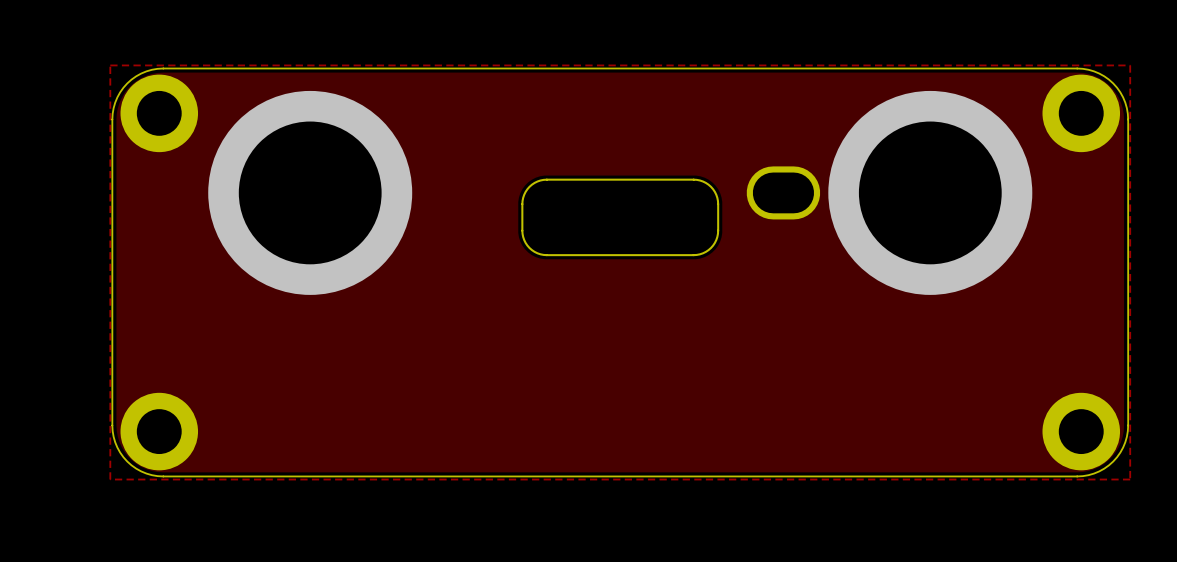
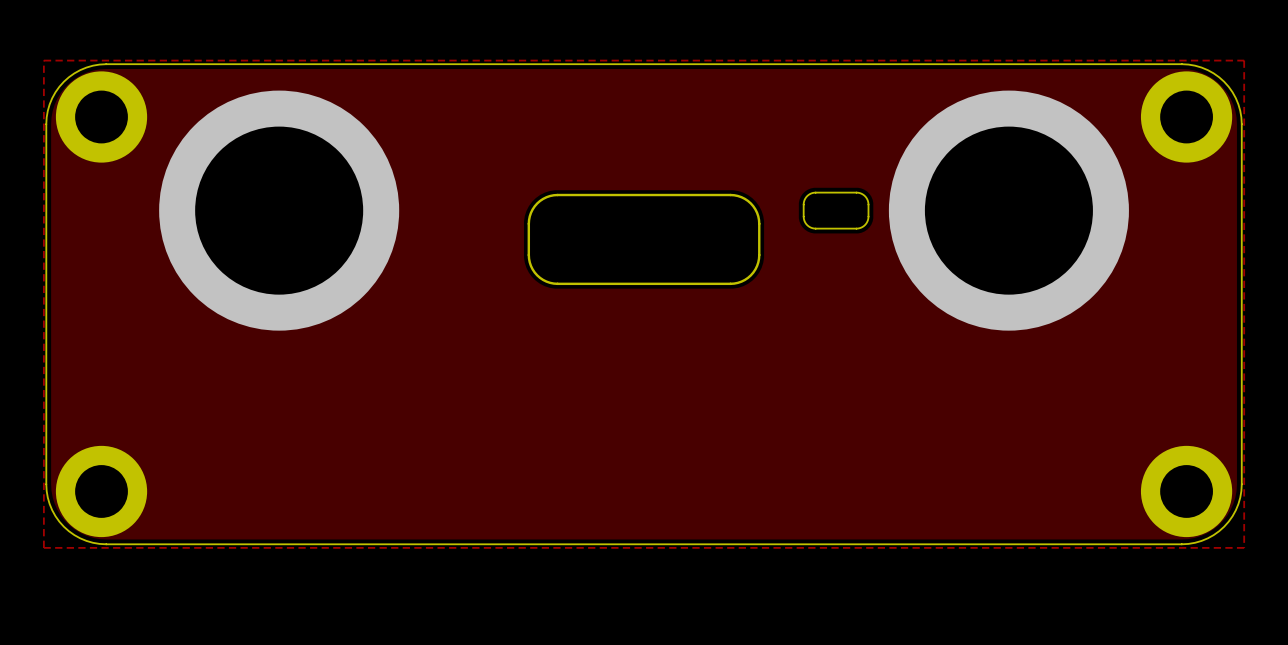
board edge: none -> (815, 192) (862, 194) (868, 203) (866, 222) (858, 228) (809, 227) (804, 219) (803, 203) (808, 195) (815, 192)
part: (783, 192) -> none

